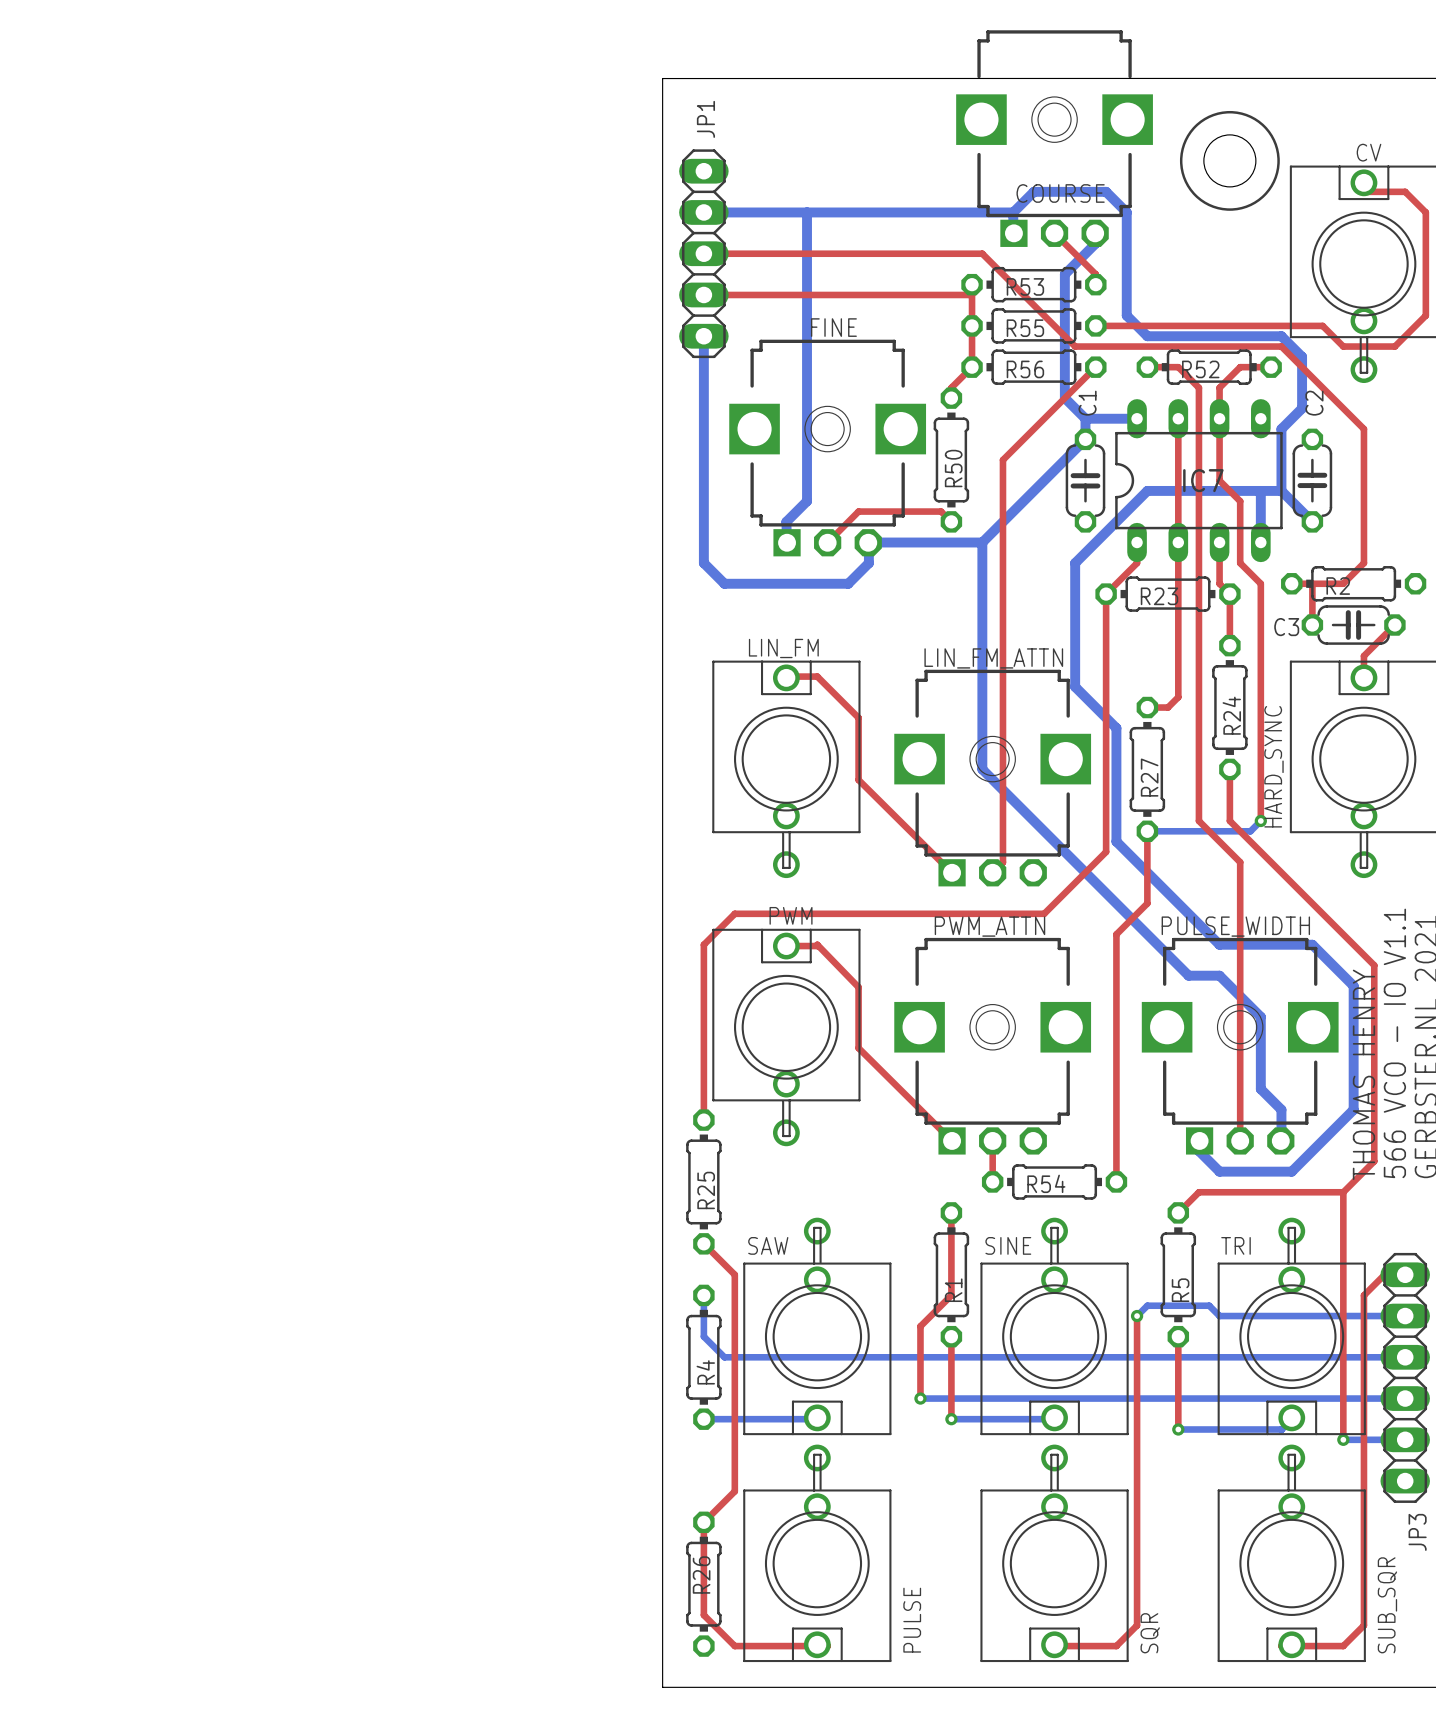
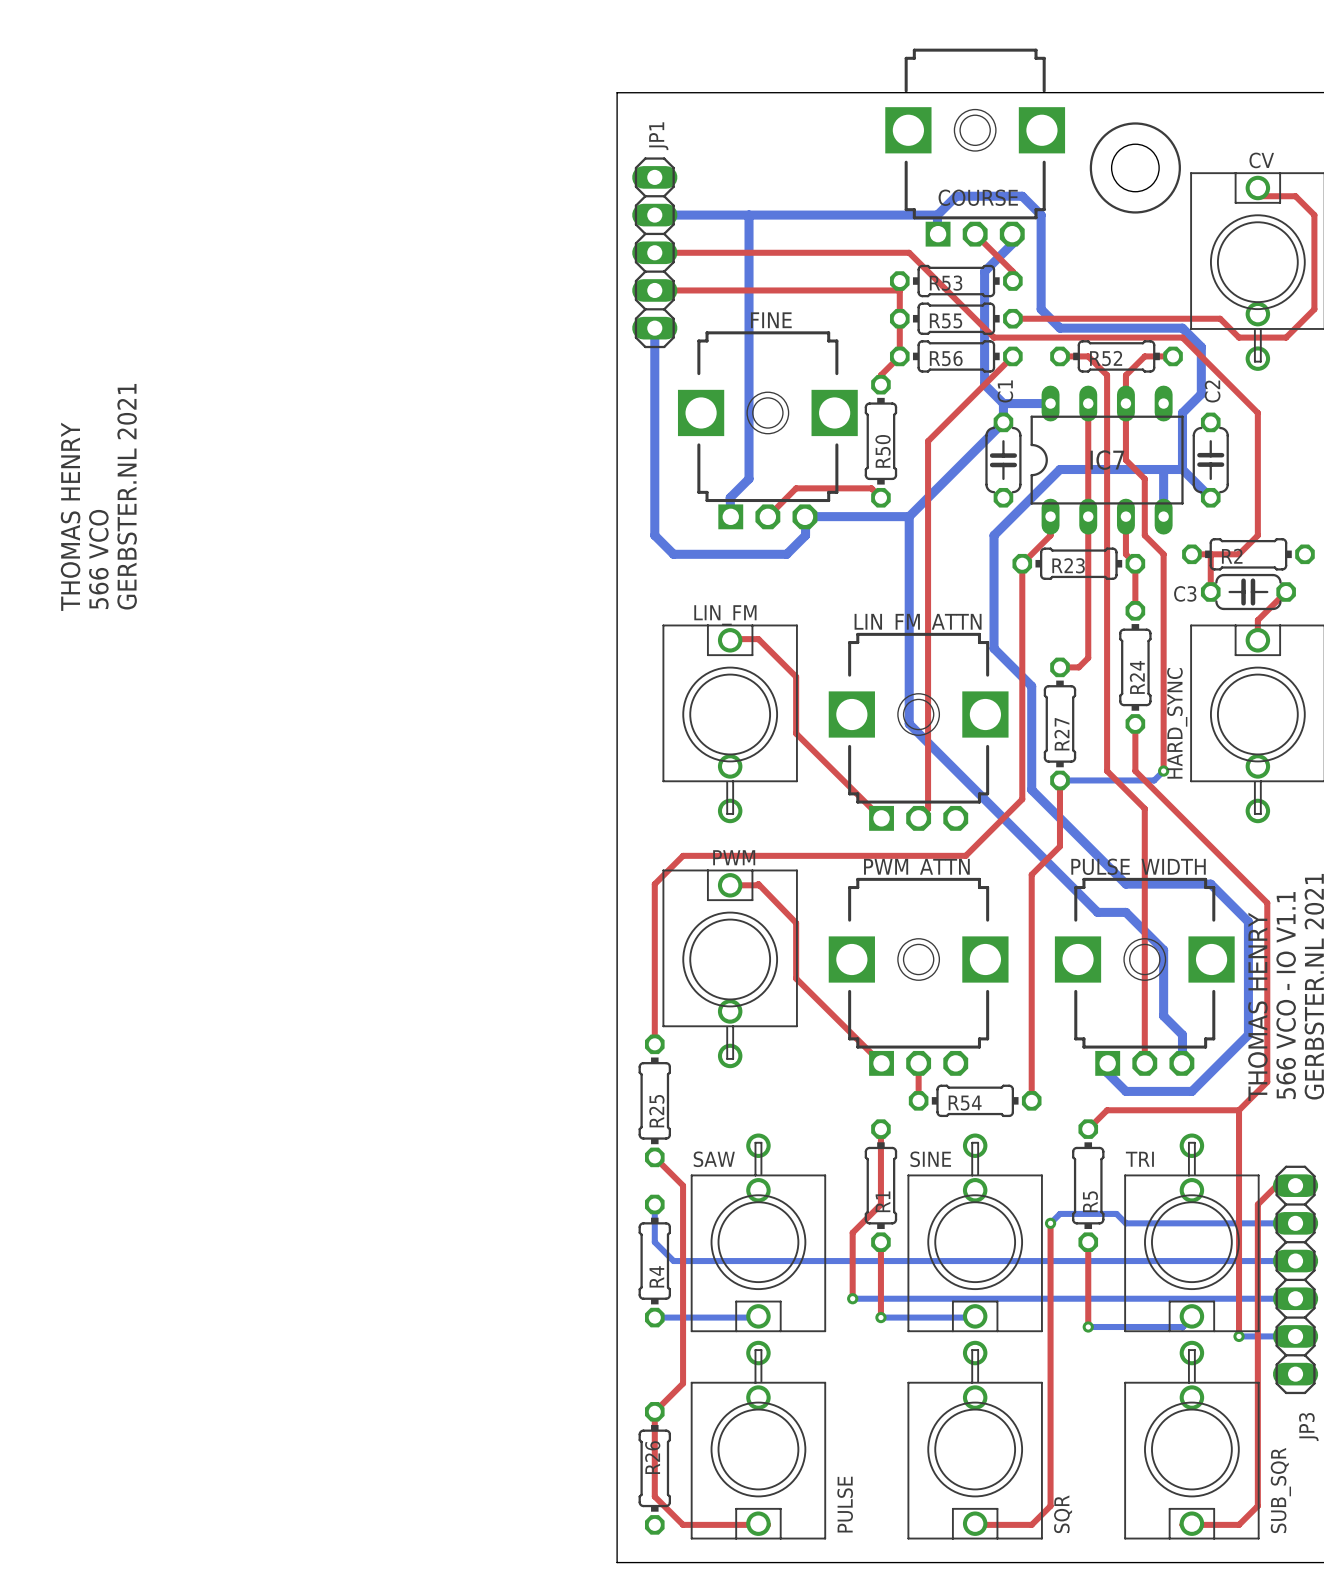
text: none -> GERBSTER.NL 2021 (127, 496)
text: none -> THOMAS HENRY (70, 516)
text: none -> 566 VCO (98, 559)

